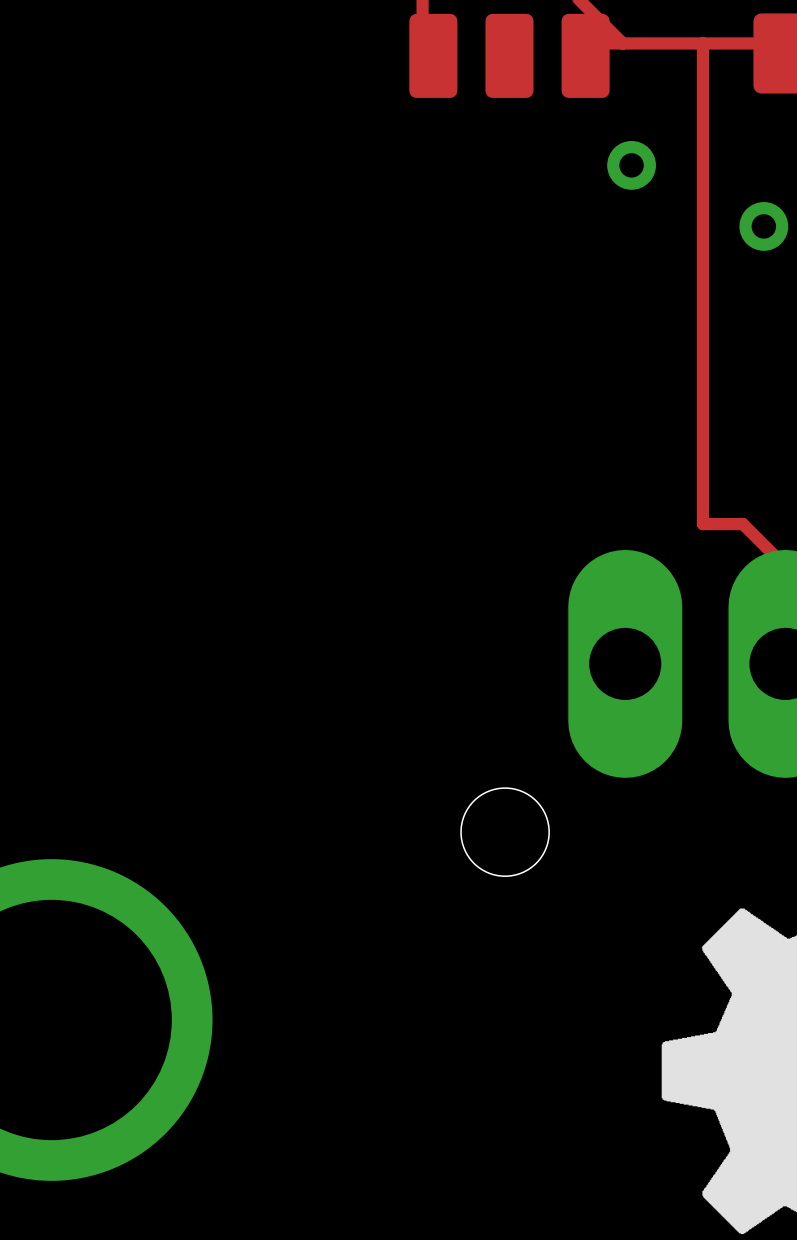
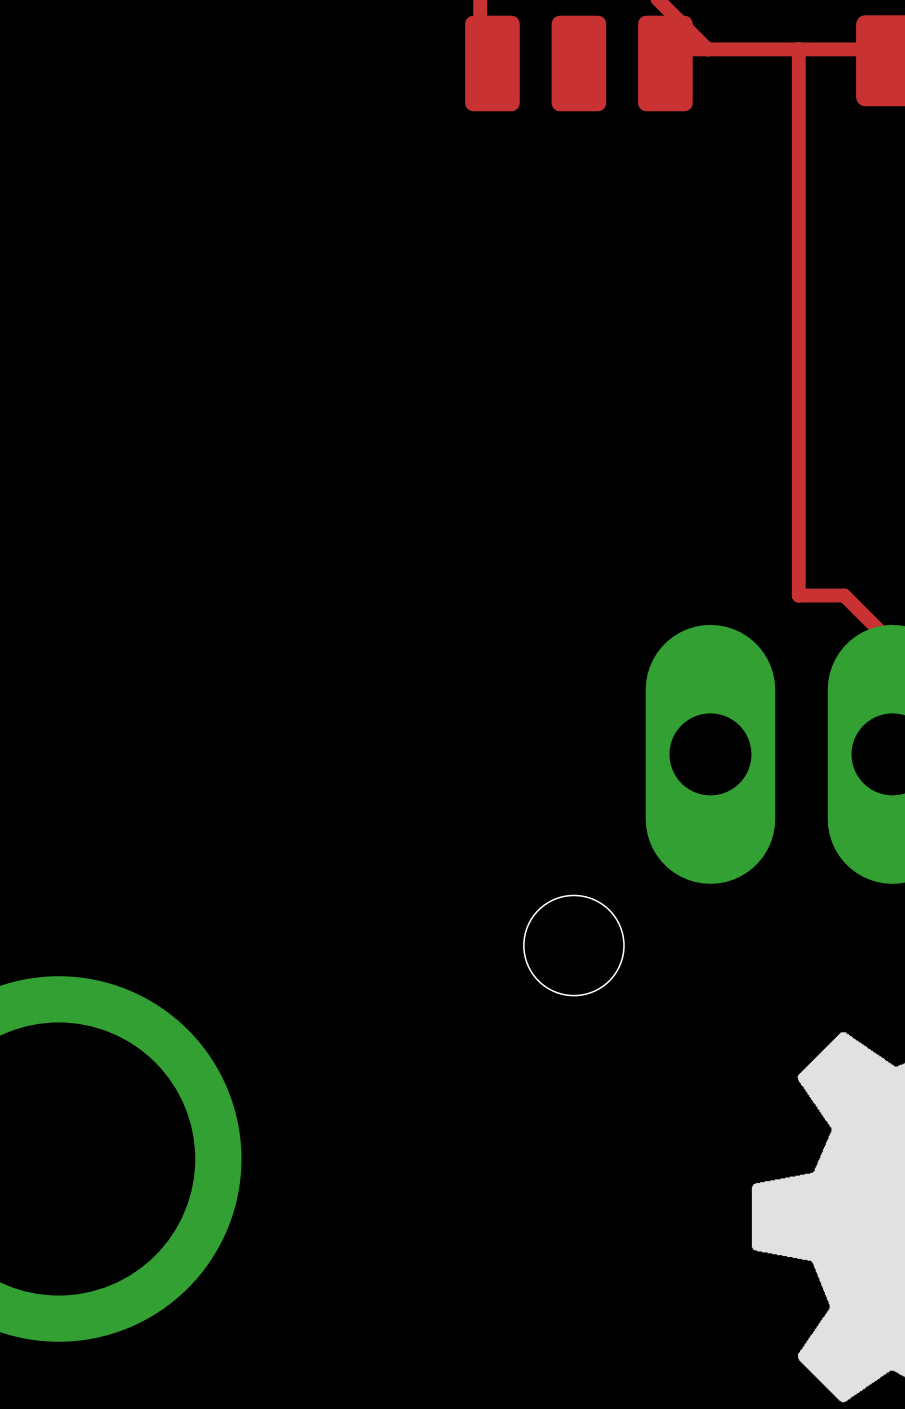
via: (631, 165) -> none
via: (763, 226) -> none

